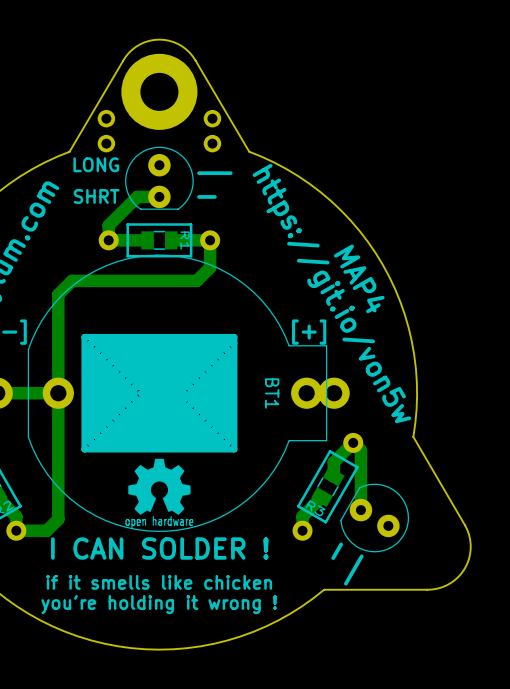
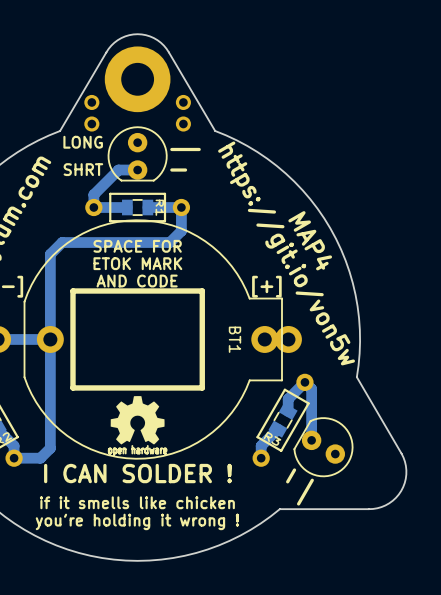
text: none -> SPACE FOR (137, 246)
text: none -> ETOK MARK (137, 263)
text: none -> AND CODE (137, 281)
line: (234, 343) (90, 343) (90, 443) (228, 443) (228, 349) (97, 349) (97, 436) (221, 436) (221, 355) (103, 355) (103, 430) (215, 430) (215, 362) (109, 362) (109, 424) (209, 424) (209, 368) (115, 368) (115, 418) (203, 418) (203, 374) (121, 374) (121, 411) (196, 411) (196, 380) (128, 380) (128, 405) (190, 405) (190, 386) (134, 386) (134, 399) (184, 399) (184, 393) (140, 393) -> none

